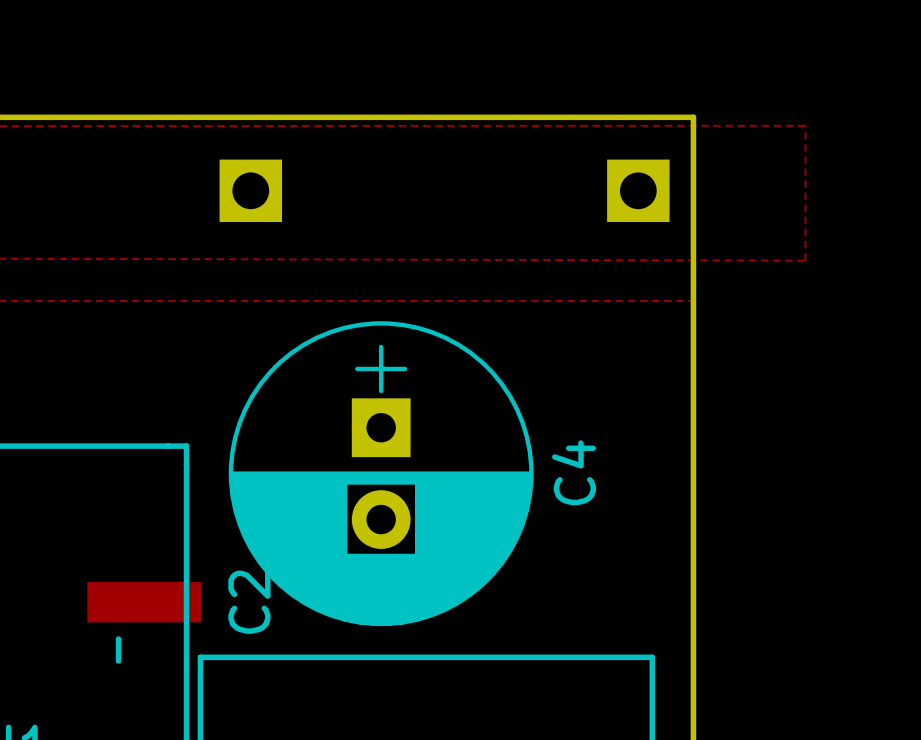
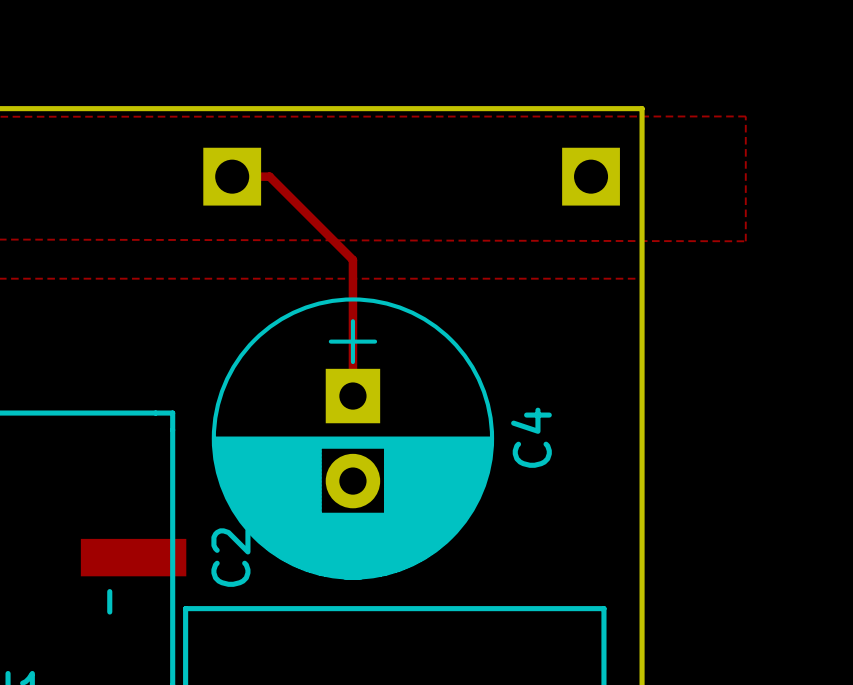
track: none -> (232, 176) (269, 176) (352, 259) (352, 396)

